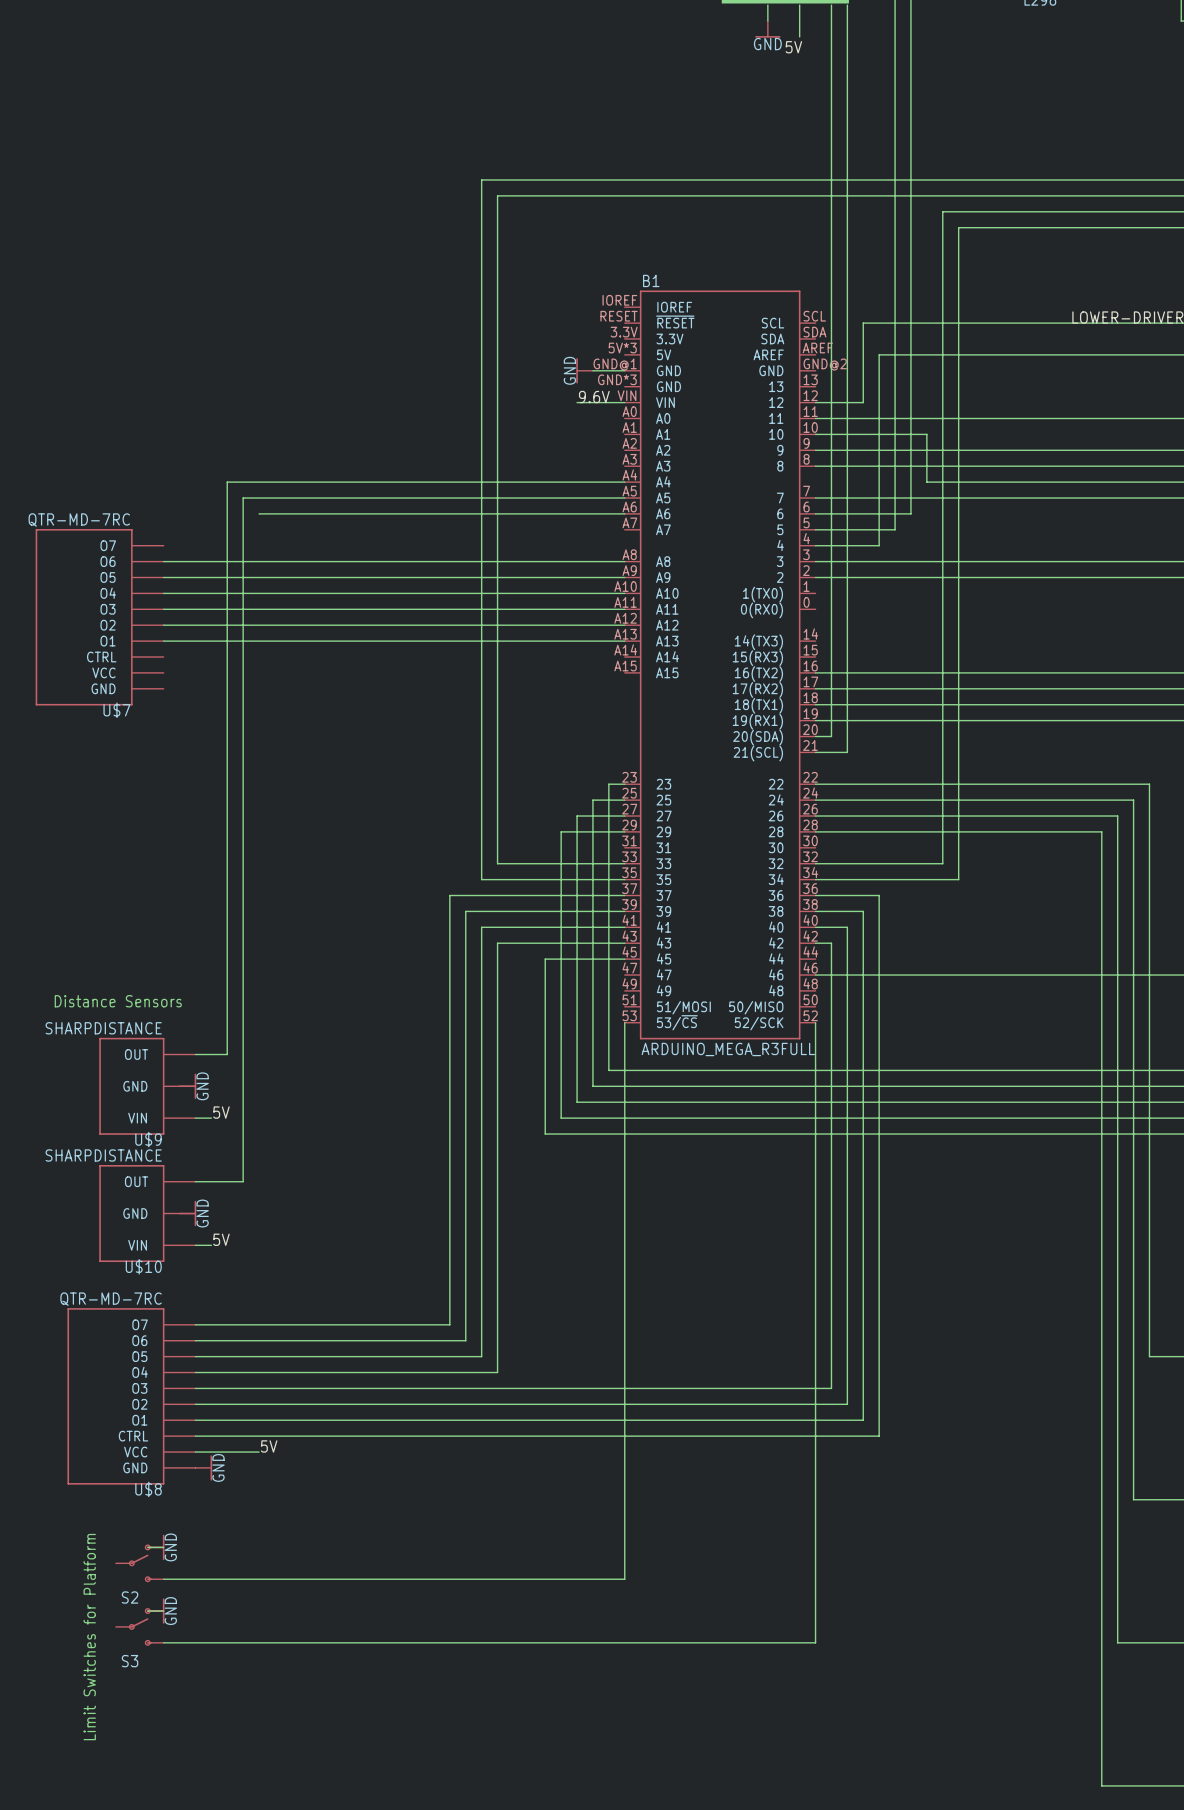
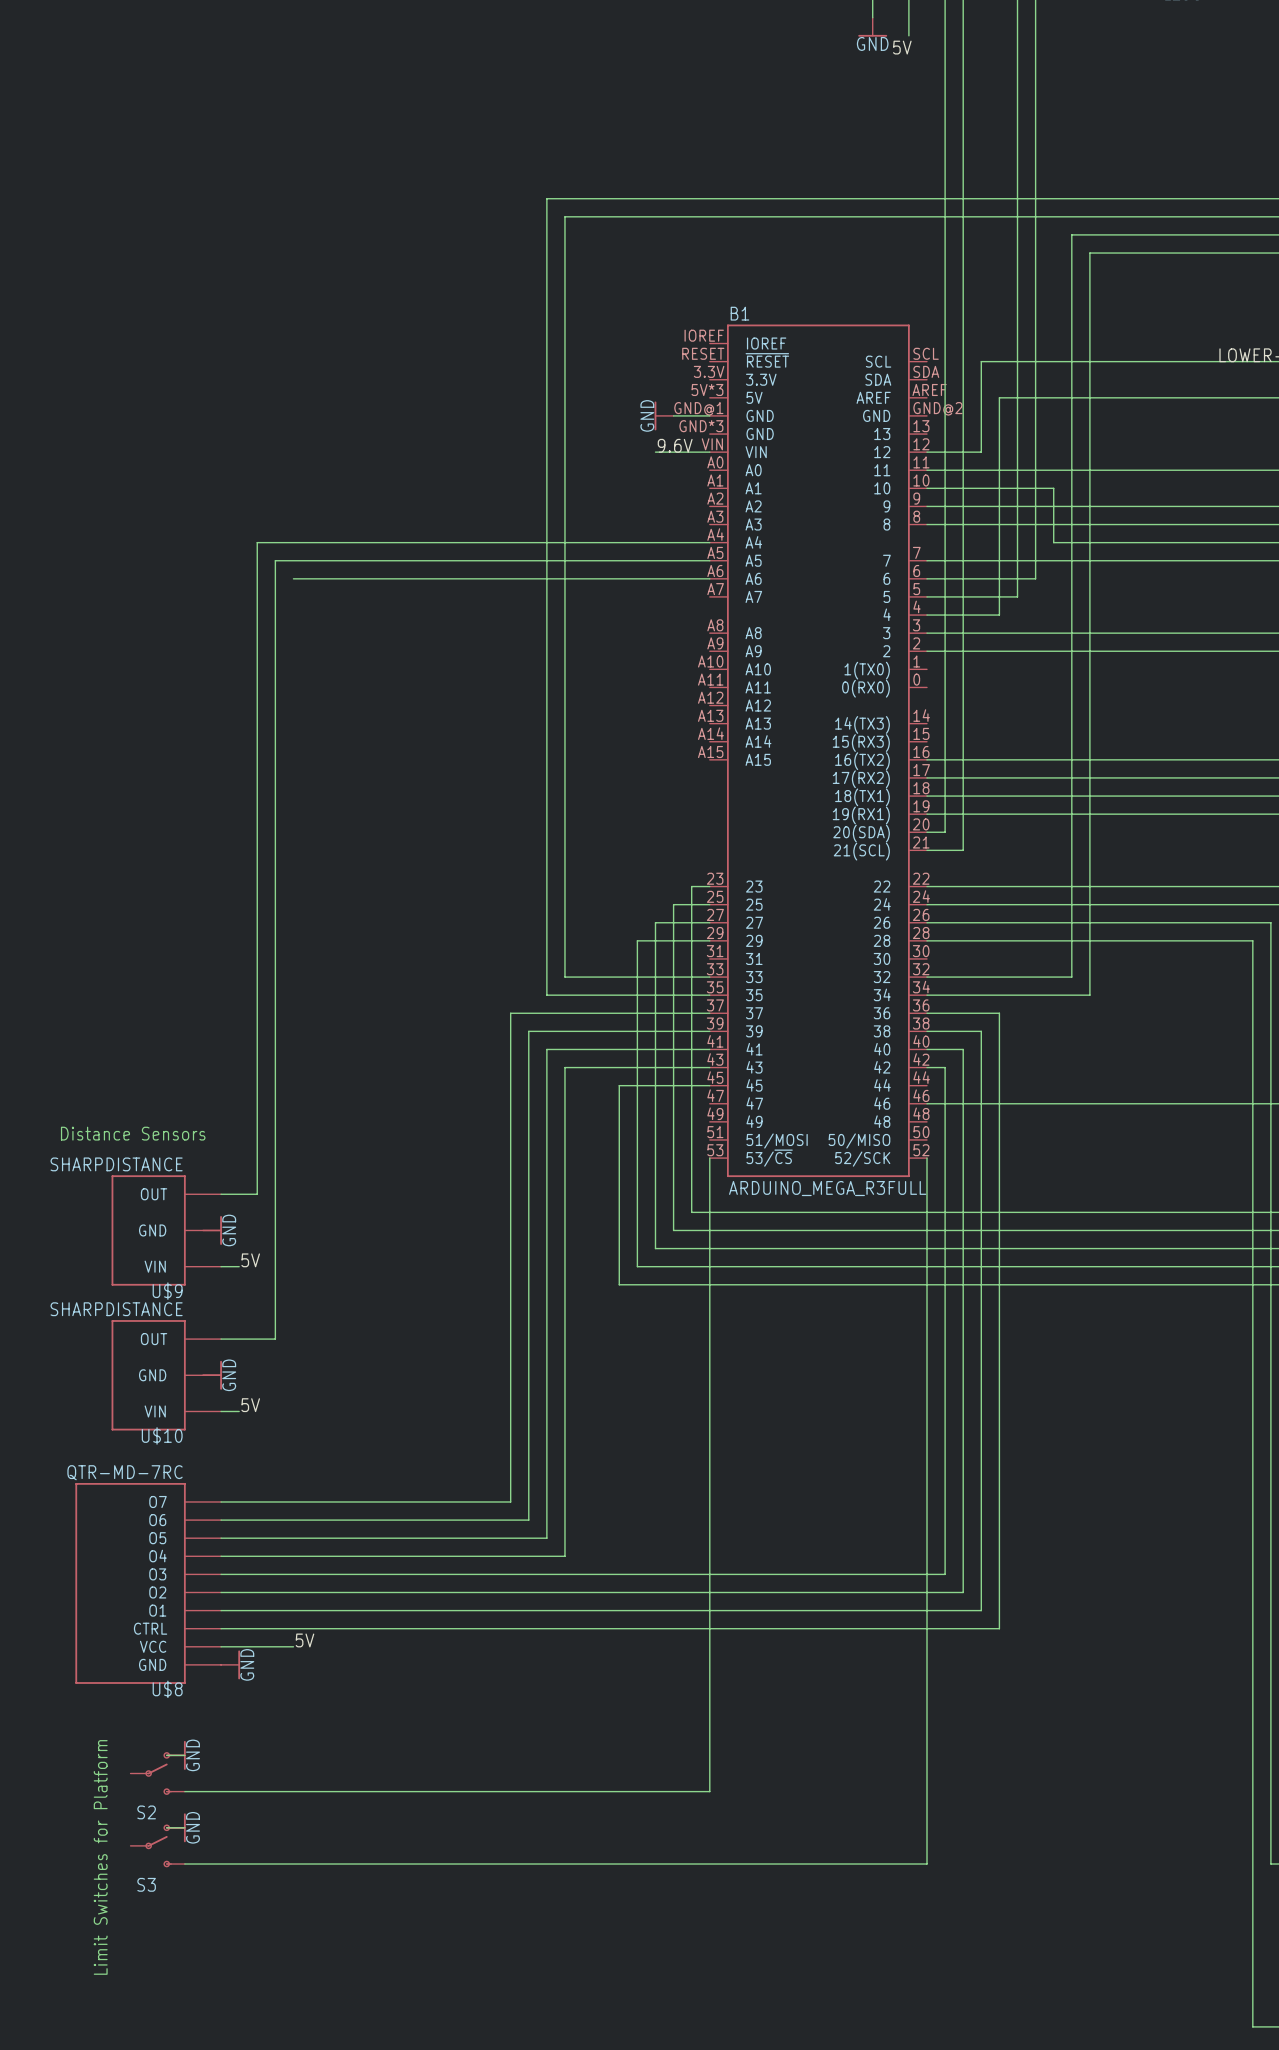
wire: (163, 561) (624, 561) -> none
wire: (163, 577) (624, 577) -> none
wire: (163, 593) (624, 593) -> none
wire: (163, 609) (624, 609) -> none
U$7: QTR-MD-7RC (99, 617) -> none
wire: (163, 625) (624, 625) -> none
wire: (163, 641) (624, 641) -> none

